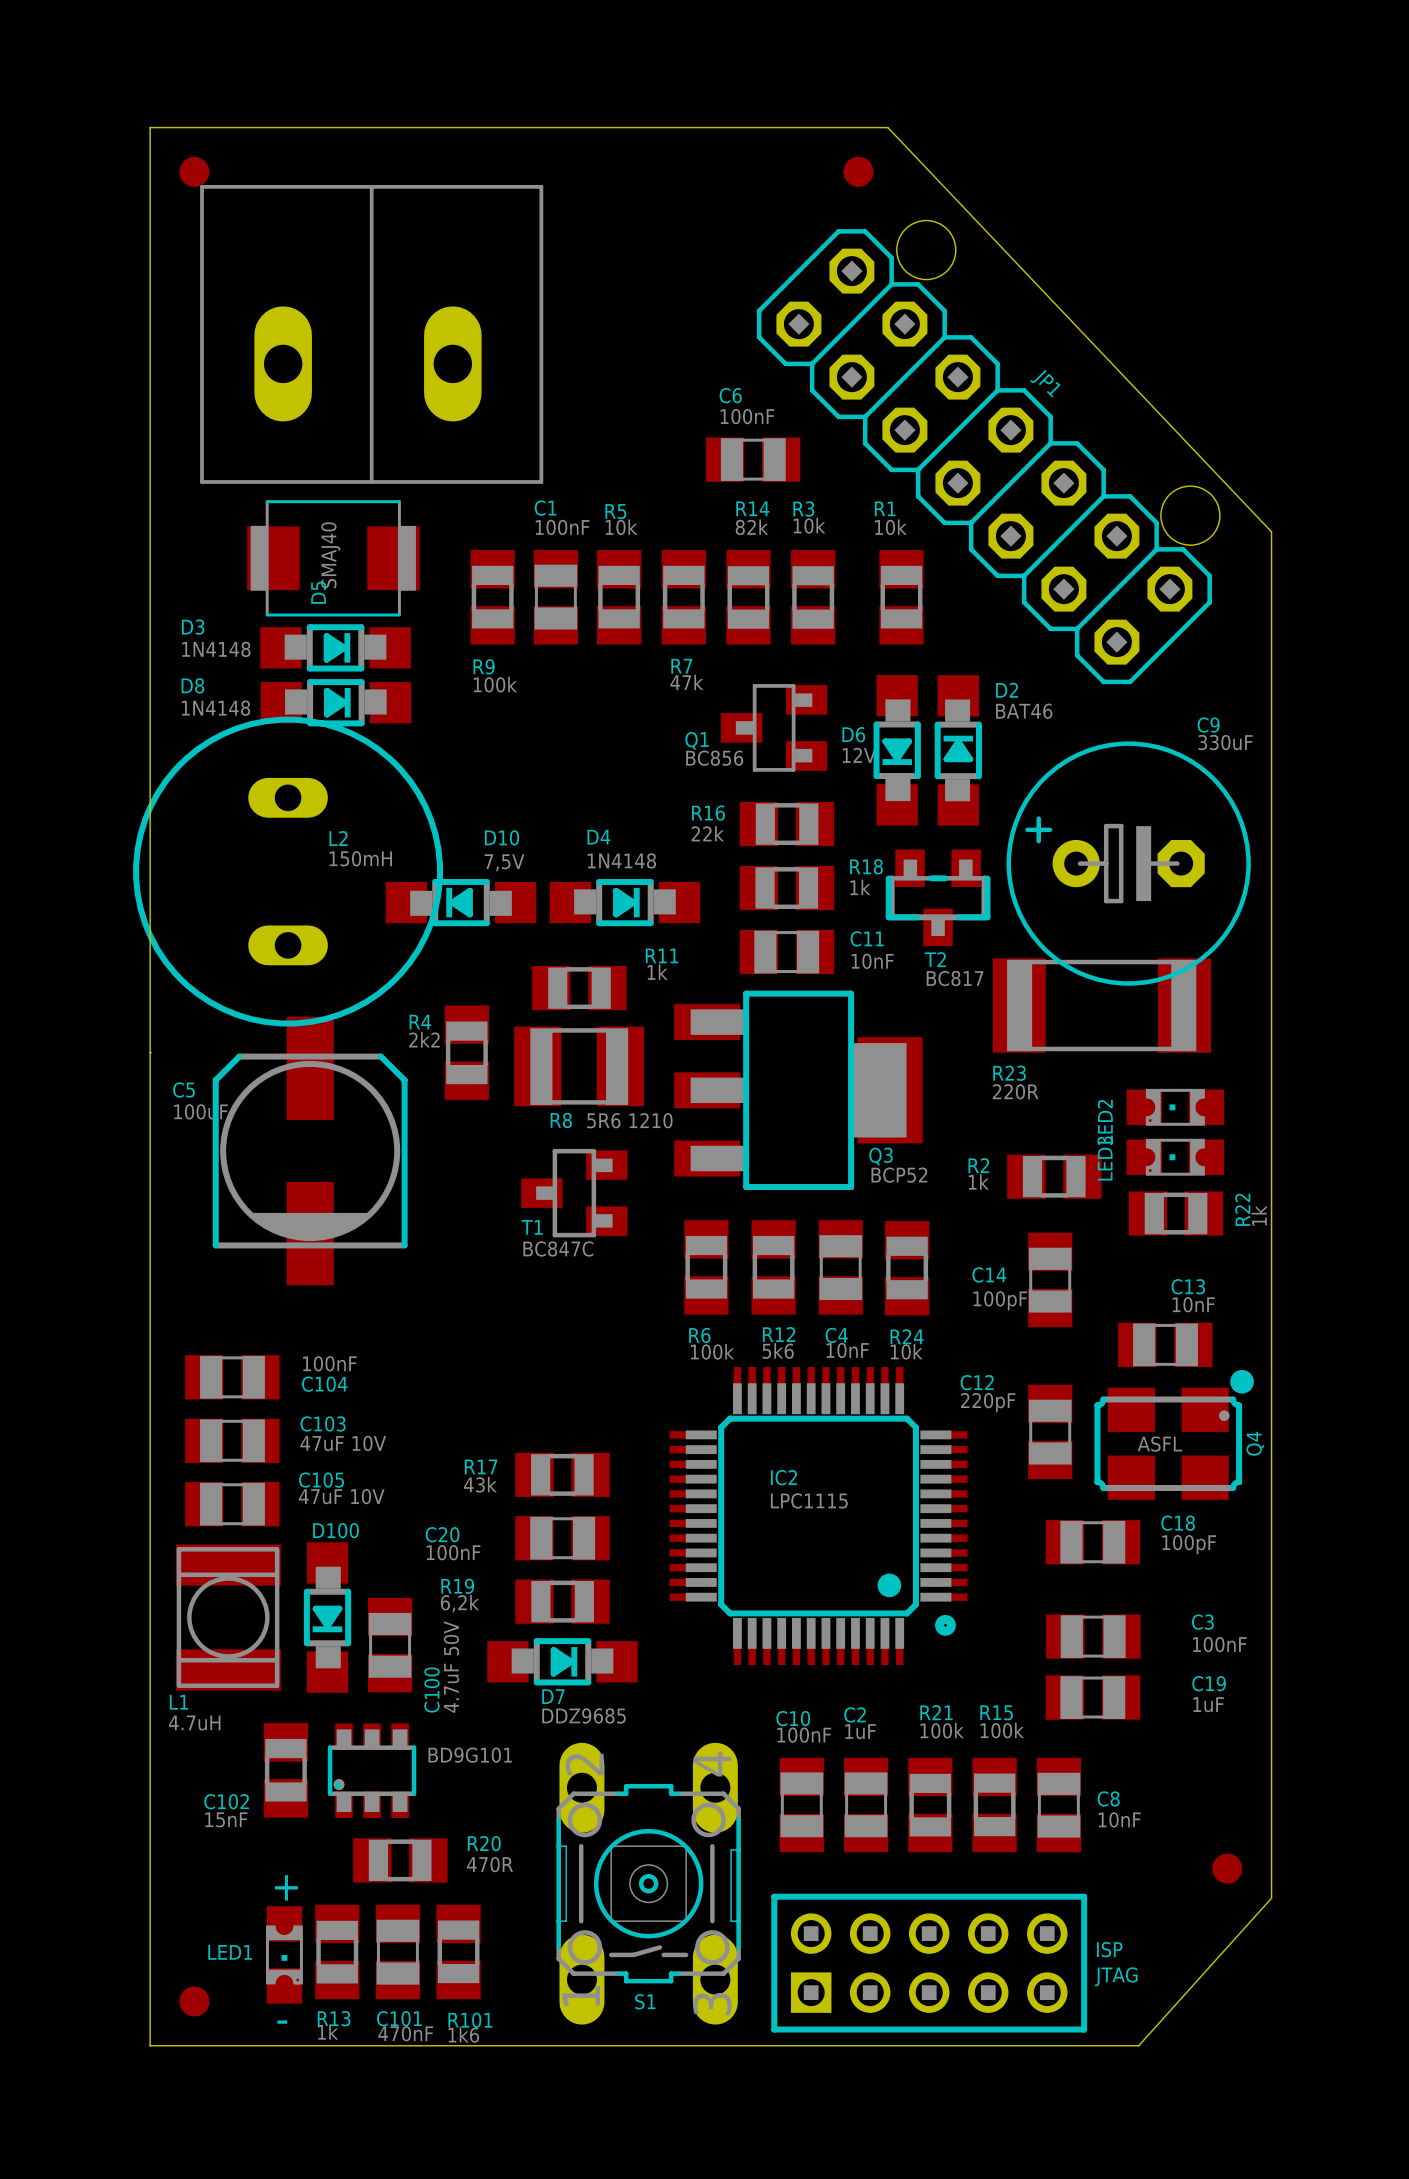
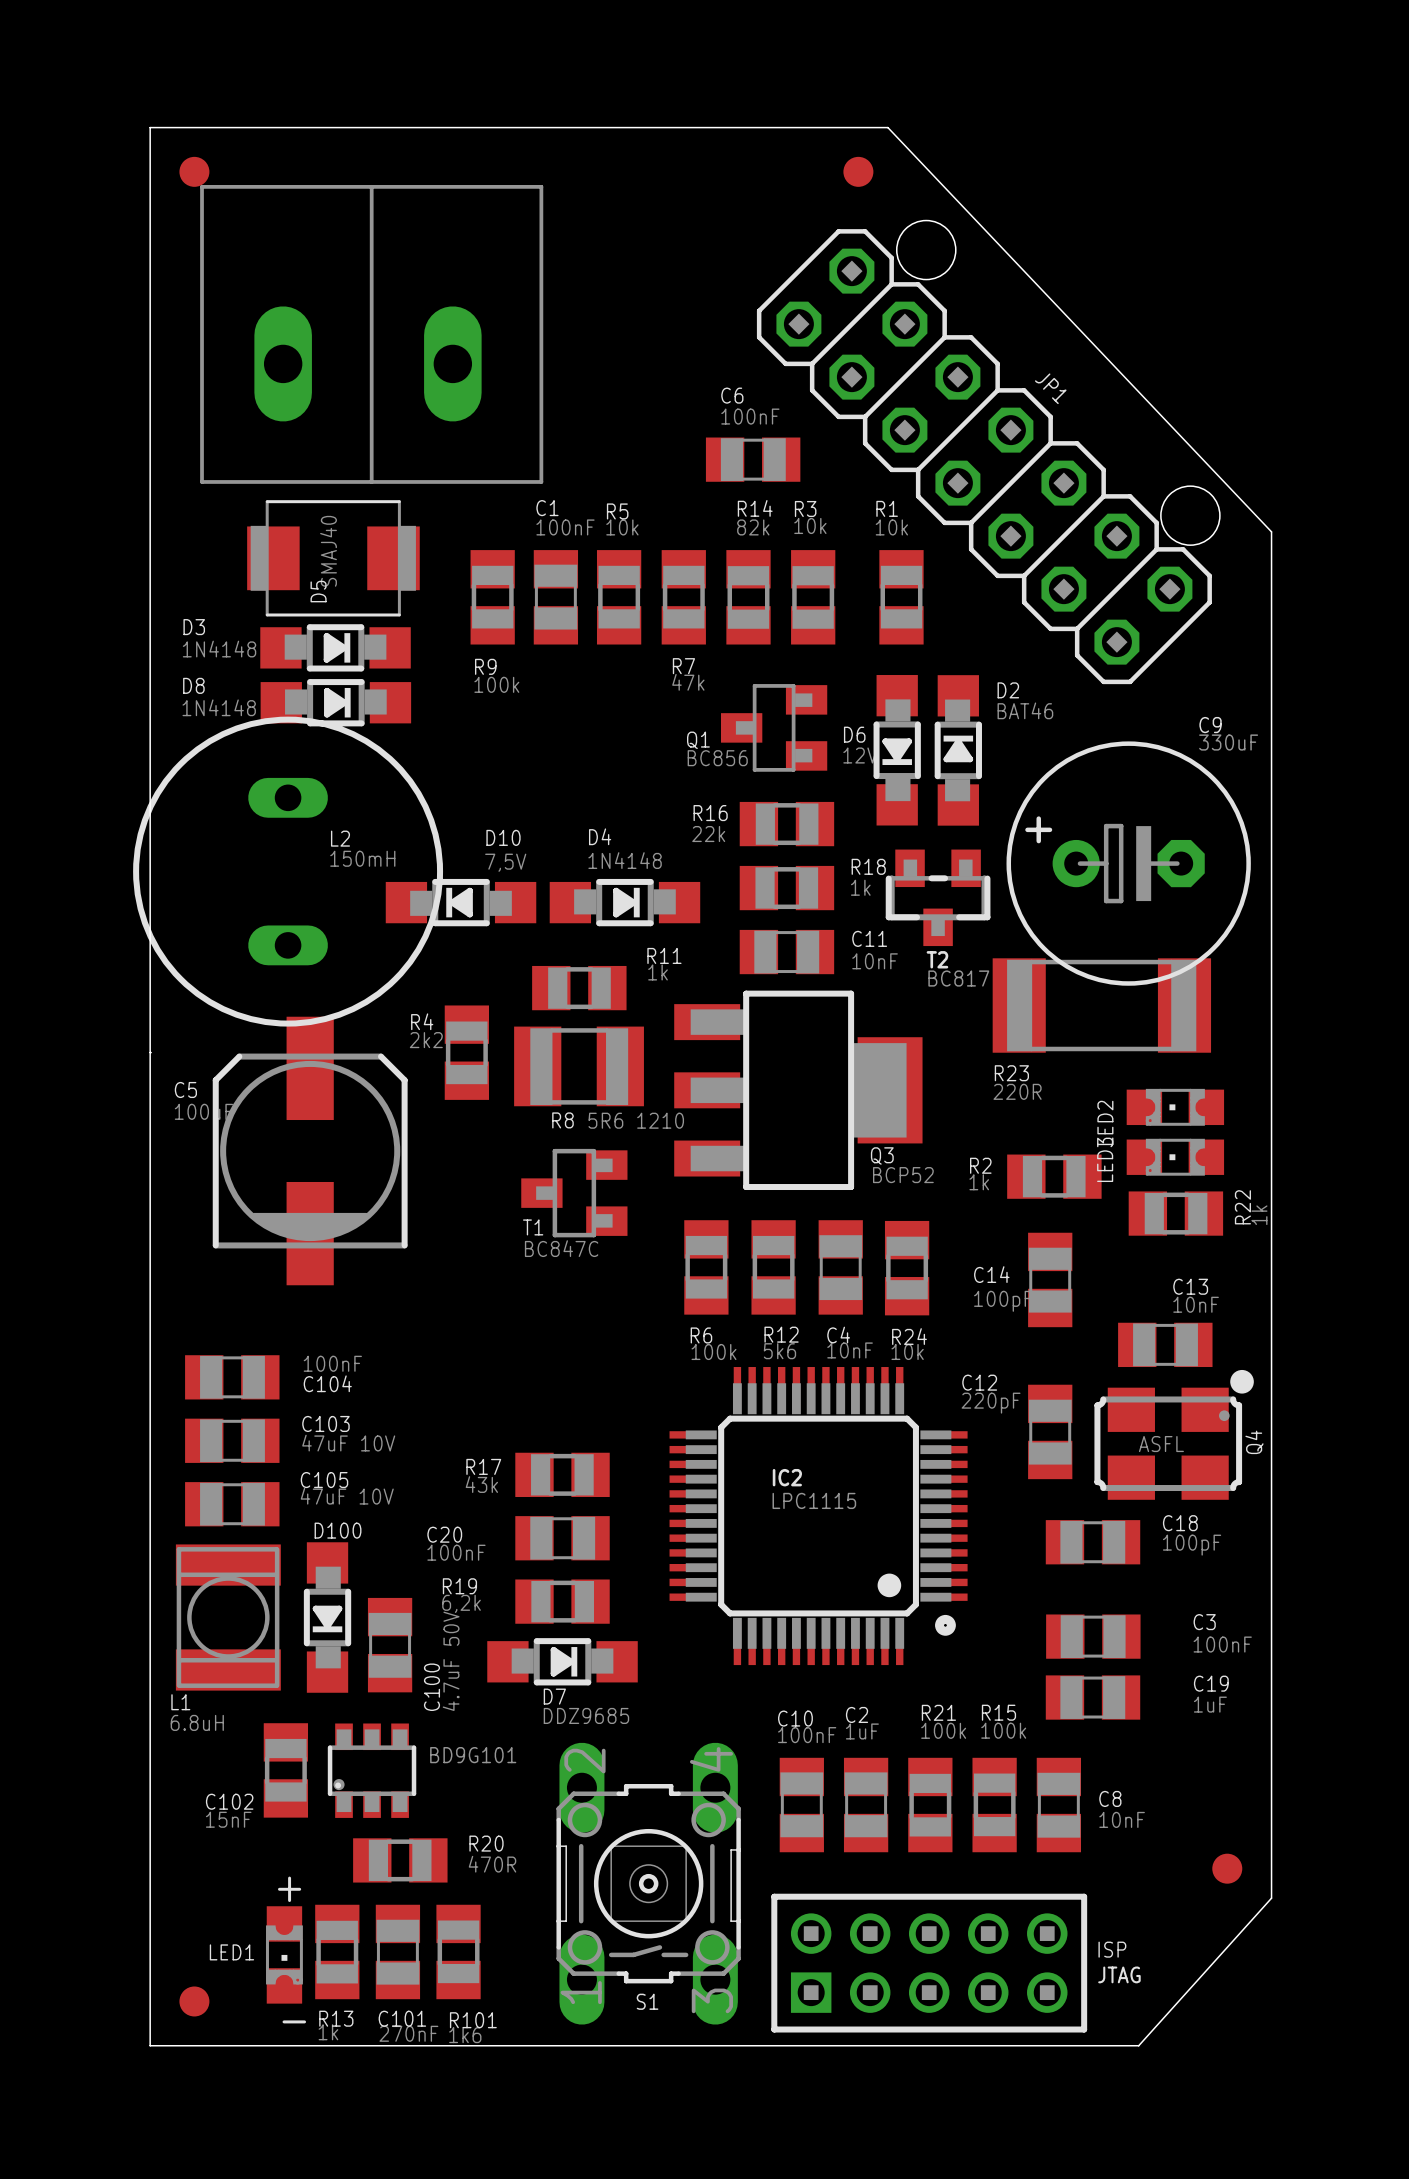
L1 value: 4.7uH (194, 1723) -> 6.8uH (197, 1722)
C101 value: 470nF (405, 2033) -> 270nF (408, 2033)

